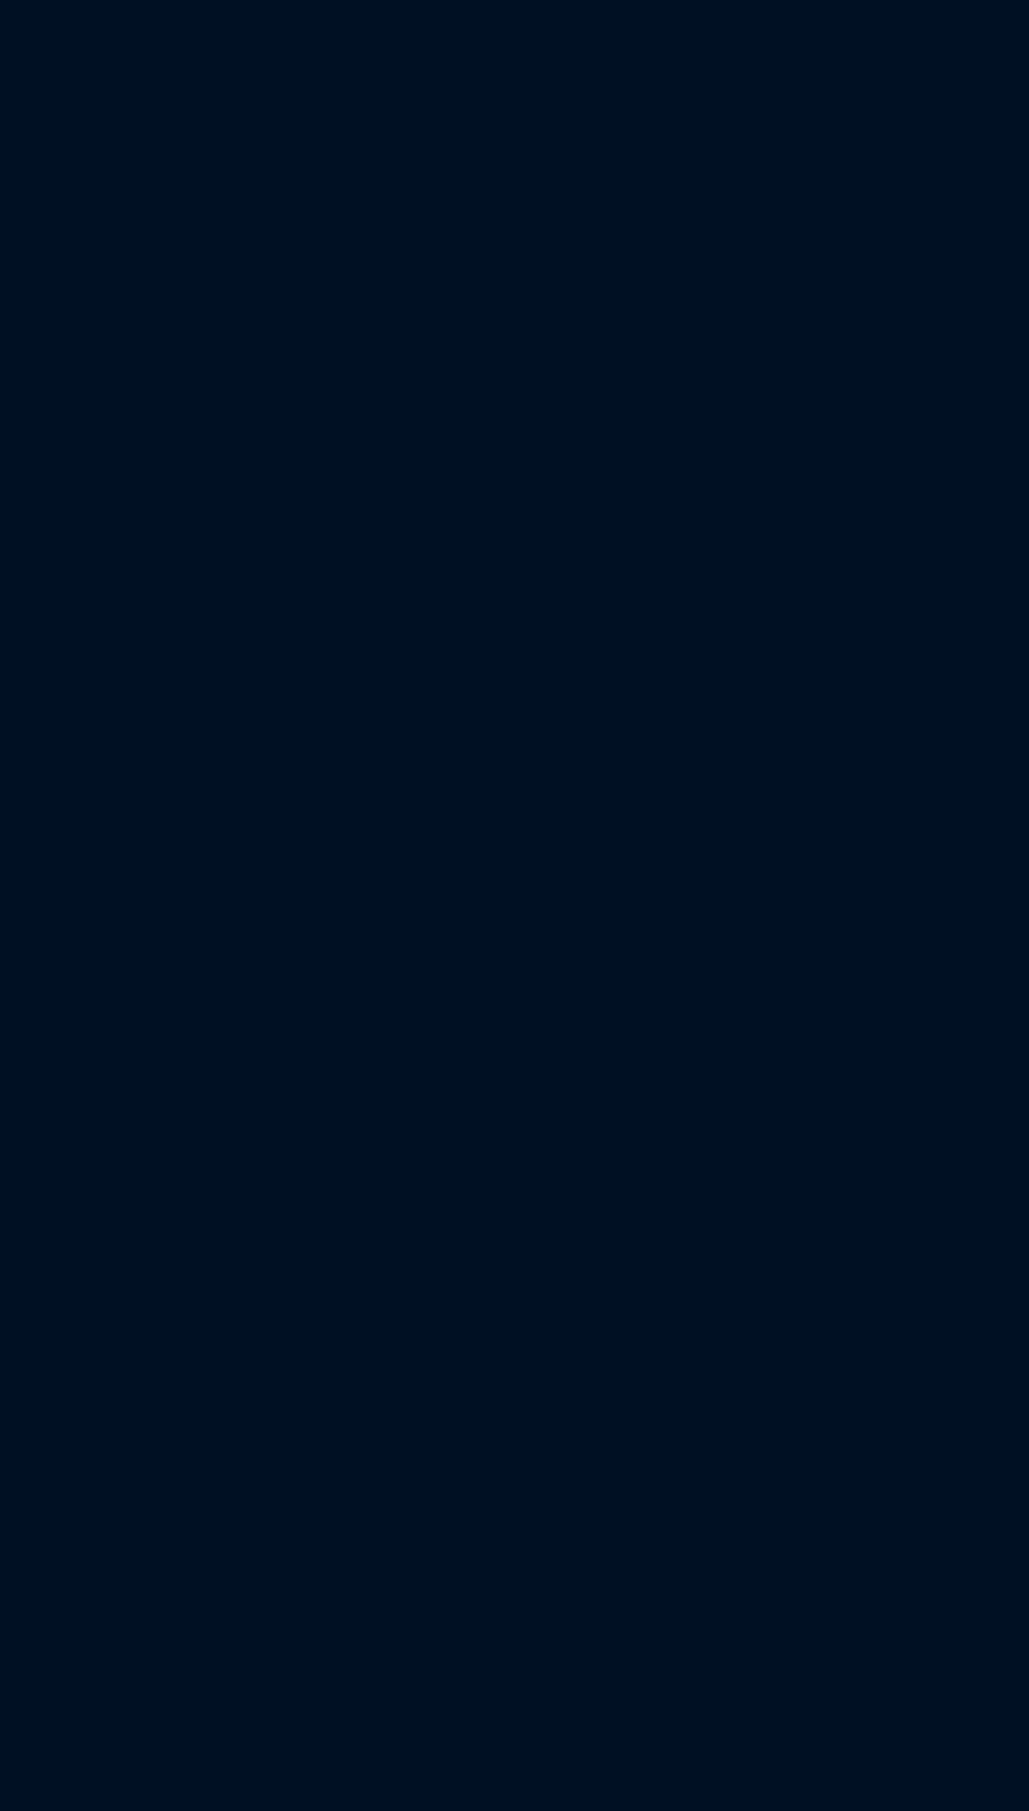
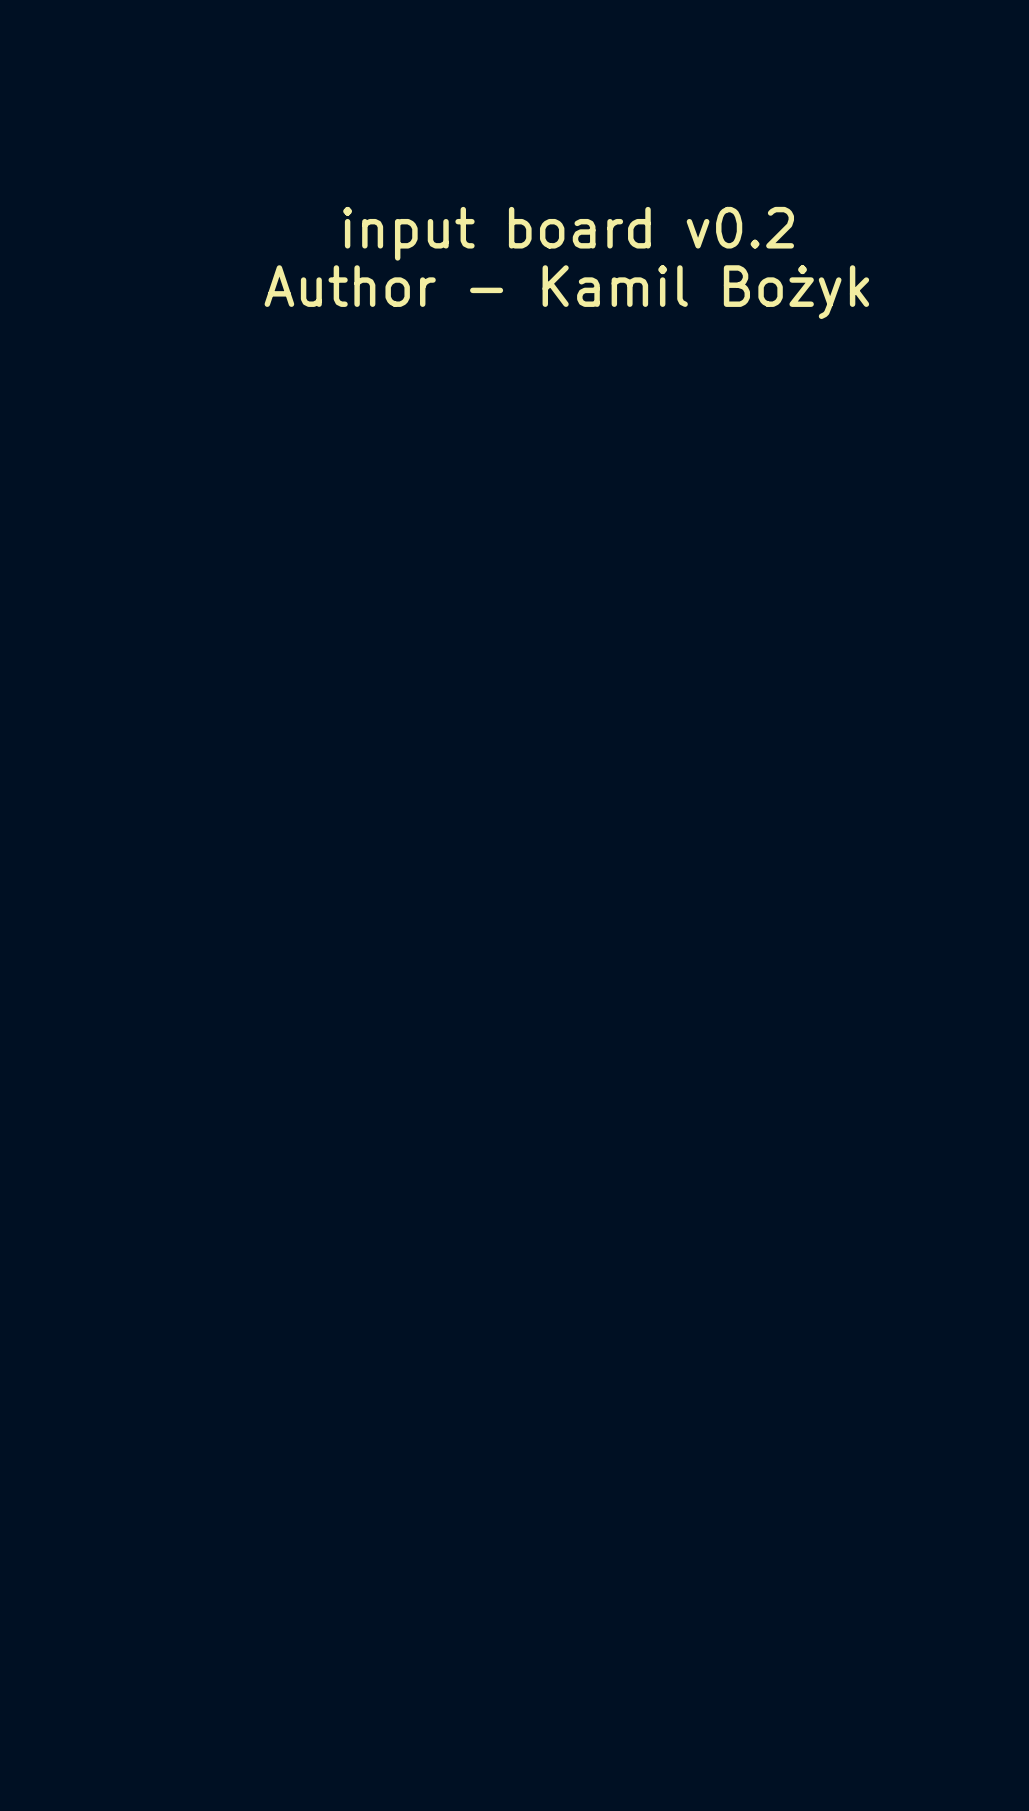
text: none -> input board v0.2 (568, 233)
text: none -> Author - Kamil Bożyk (566, 292)

